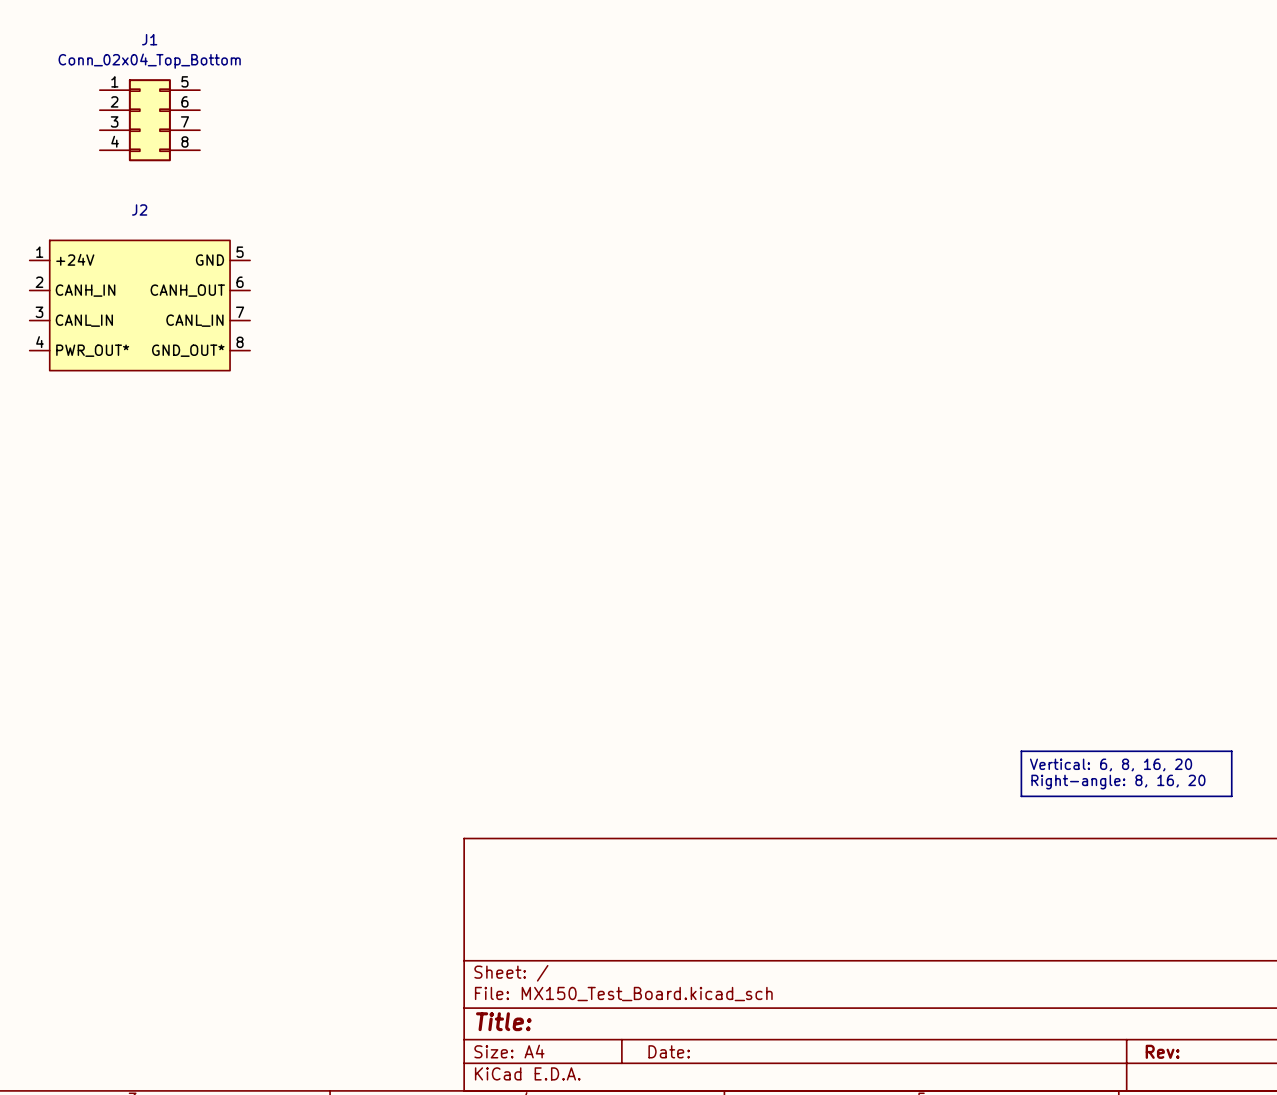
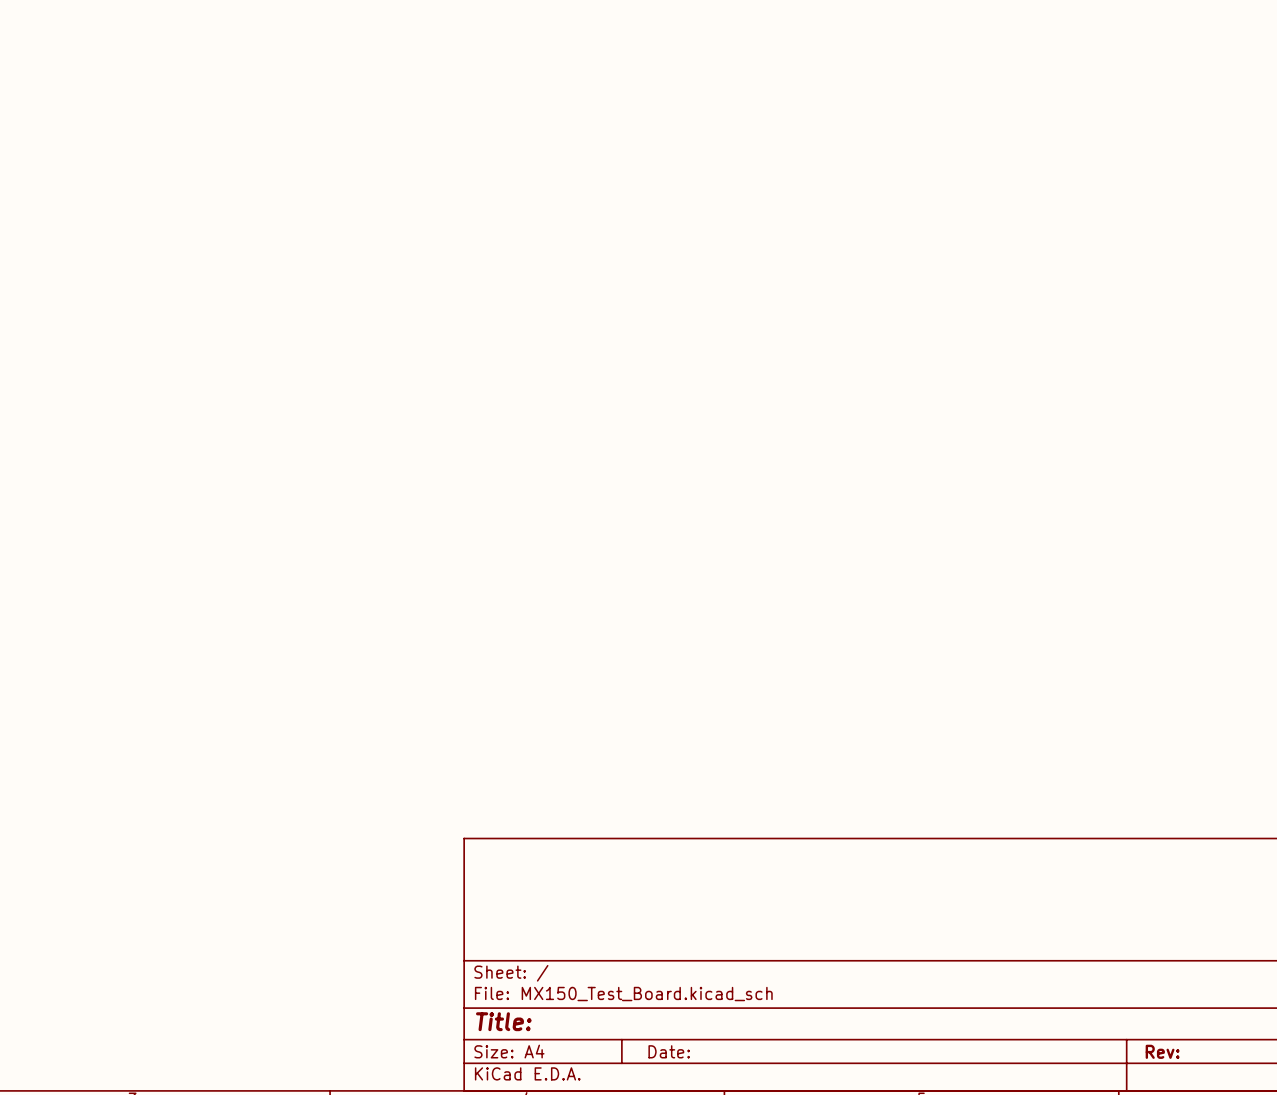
J1: Conn_02x04_Top_Bottom (149, 120) -> none
J2: (139, 305) -> none
line: (1021, 751) (1231, 751) (1231, 796) (1021, 796) (1021, 751) -> none
text: Vertical: 6, 8, 16, 20 (1111, 764) -> none
text: Right-angle: 8, 16, 20 (1118, 782) -> none

